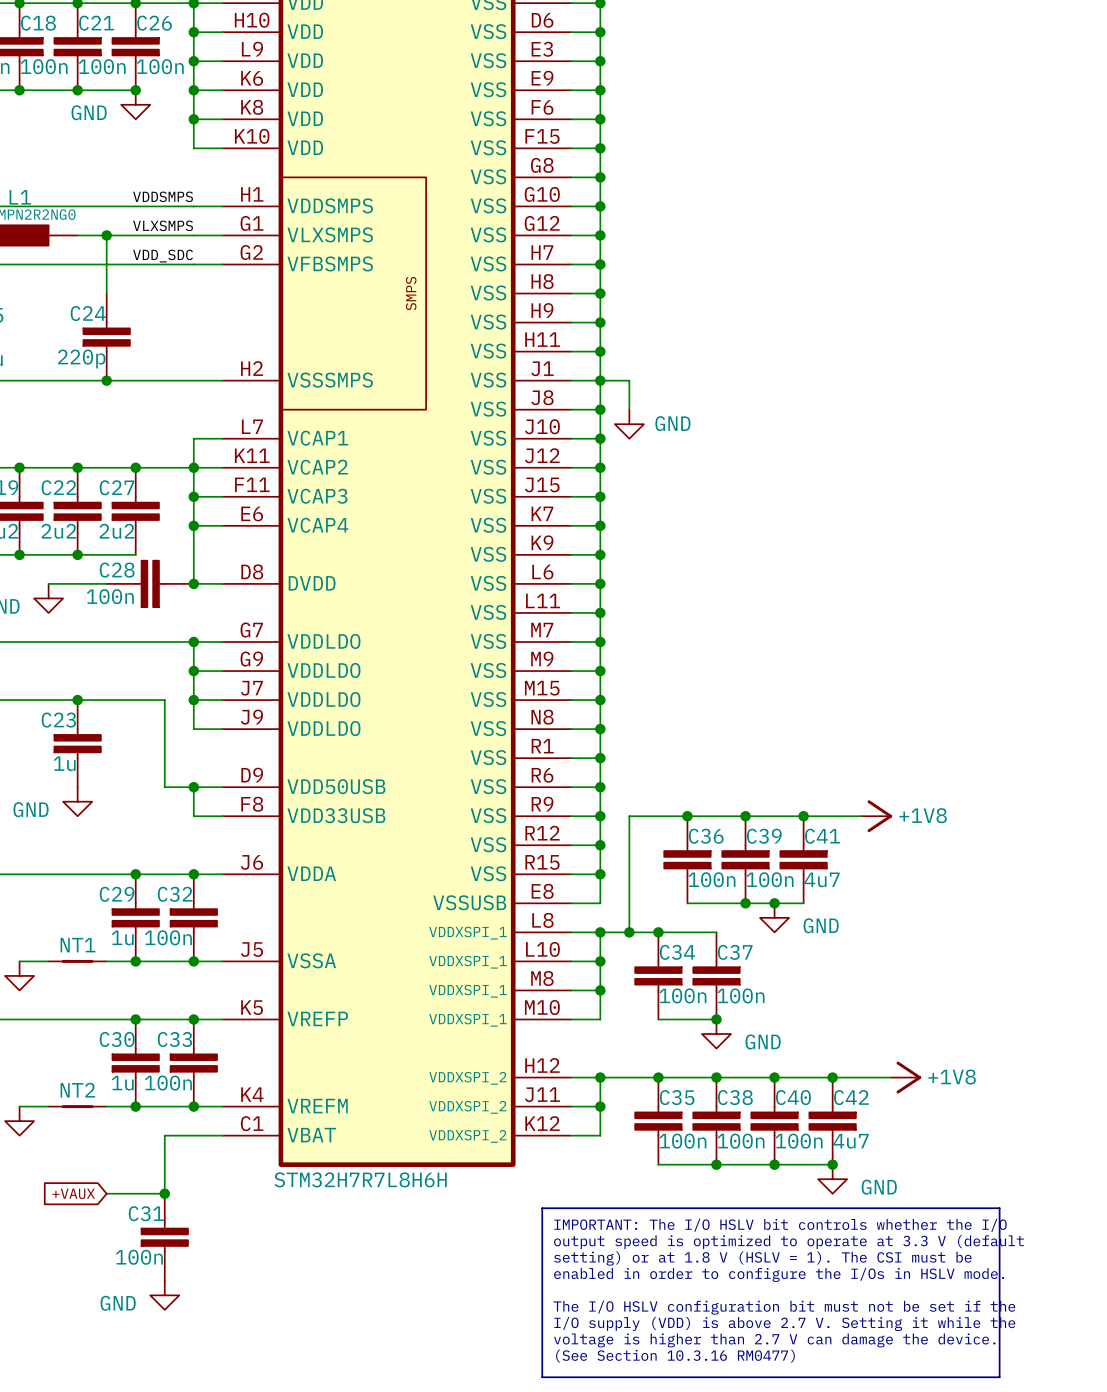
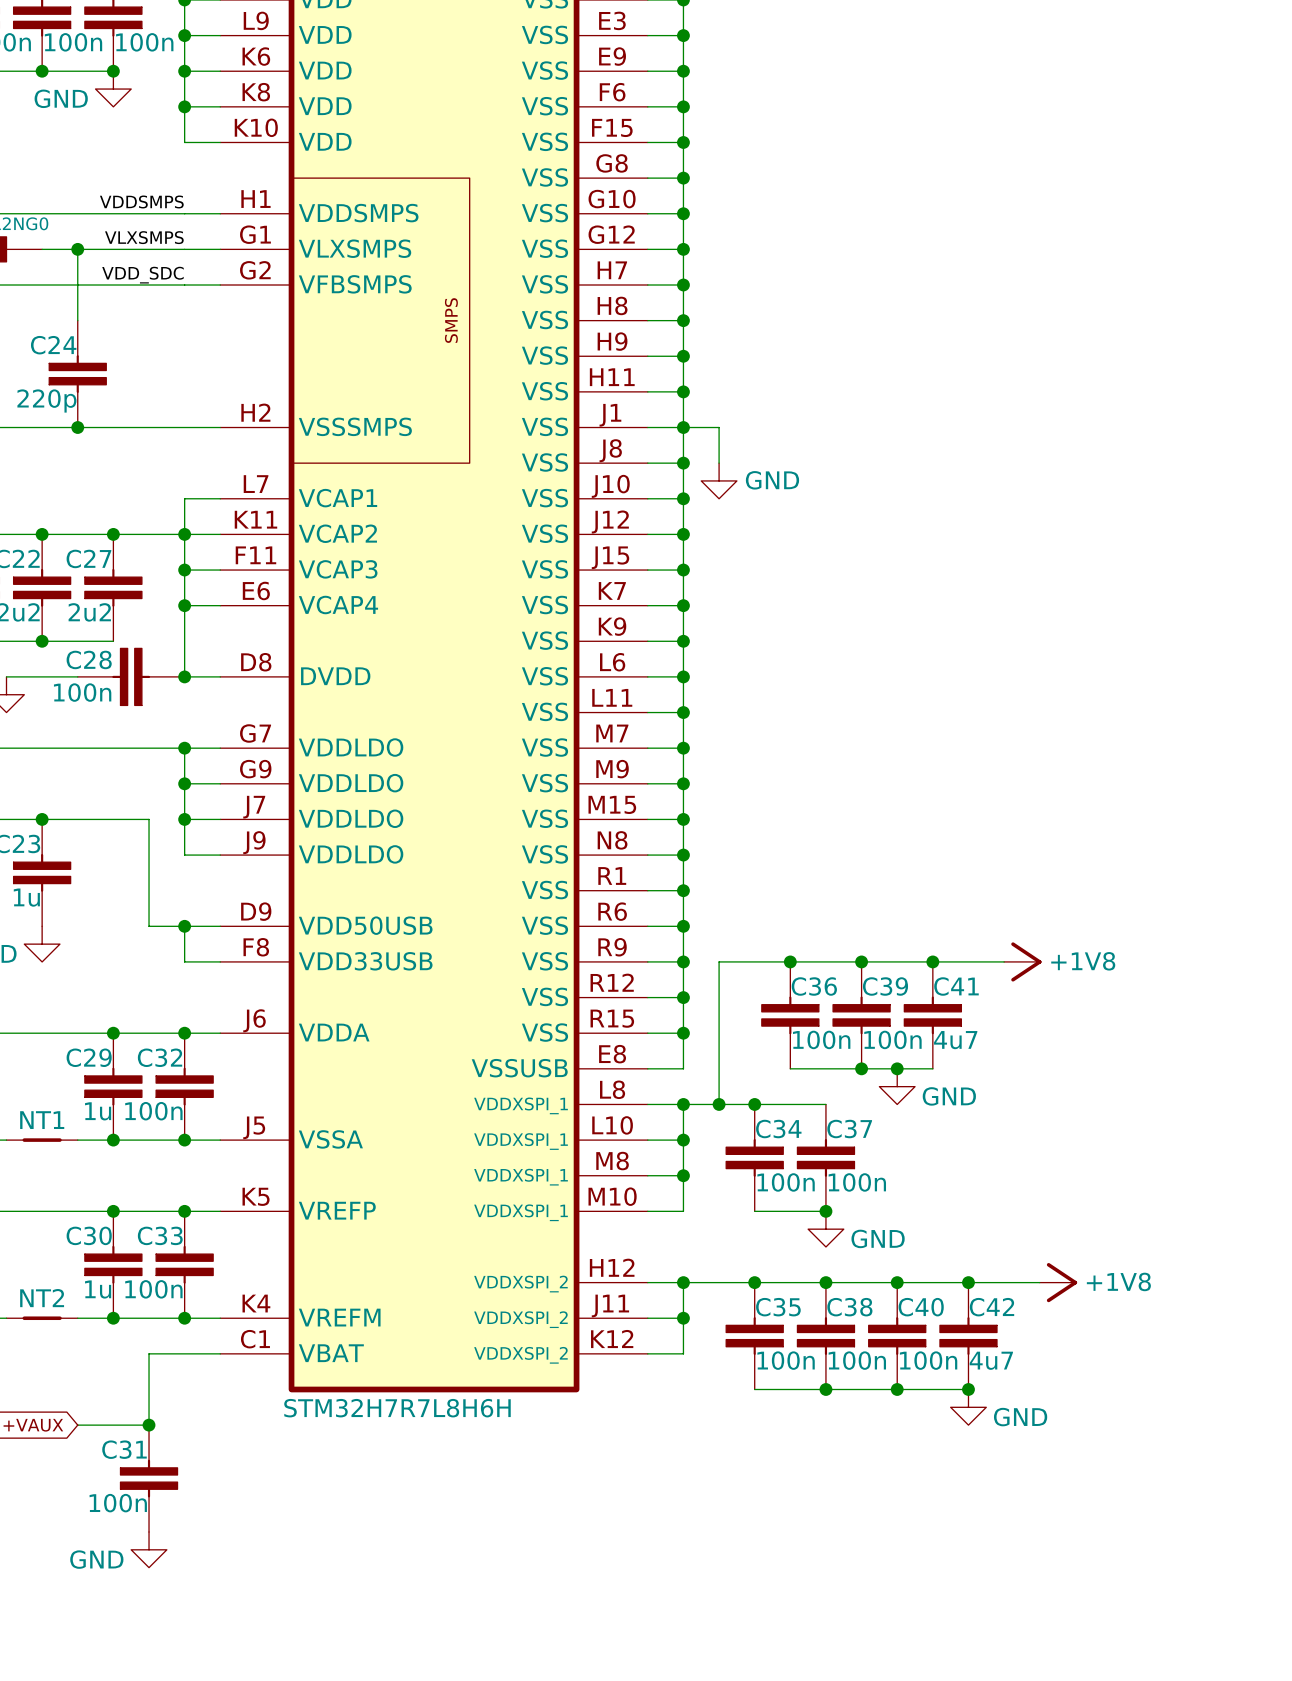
line: (542, 1208) (999, 1208) (999, 1377) (542, 1377) (542, 1208) -> none
text: IMPORTANT: The I/O HSLV bit controls whether the I/O (780, 1225) -> none
text: output speed is optimized to operate at 3.3 V (default (788, 1242) -> none
text: setting) or at 1.8 V (HSLV = 1). The CSI must be (762, 1258) -> none
text: enabled in order to configure the I/Os in HSLV mode. (779, 1274) -> none
text: The I/O HSLV configuration bit must not be set if the (784, 1307) -> none
text: I/O supply (VDD) is above 2.7 V. Setting it while the (784, 1323) -> none
text: voltage is higher than 2.7 V can damage the device. (774, 1340) -> none
text: (See Section 10.3.16 RM0477) (675, 1356) -> none

